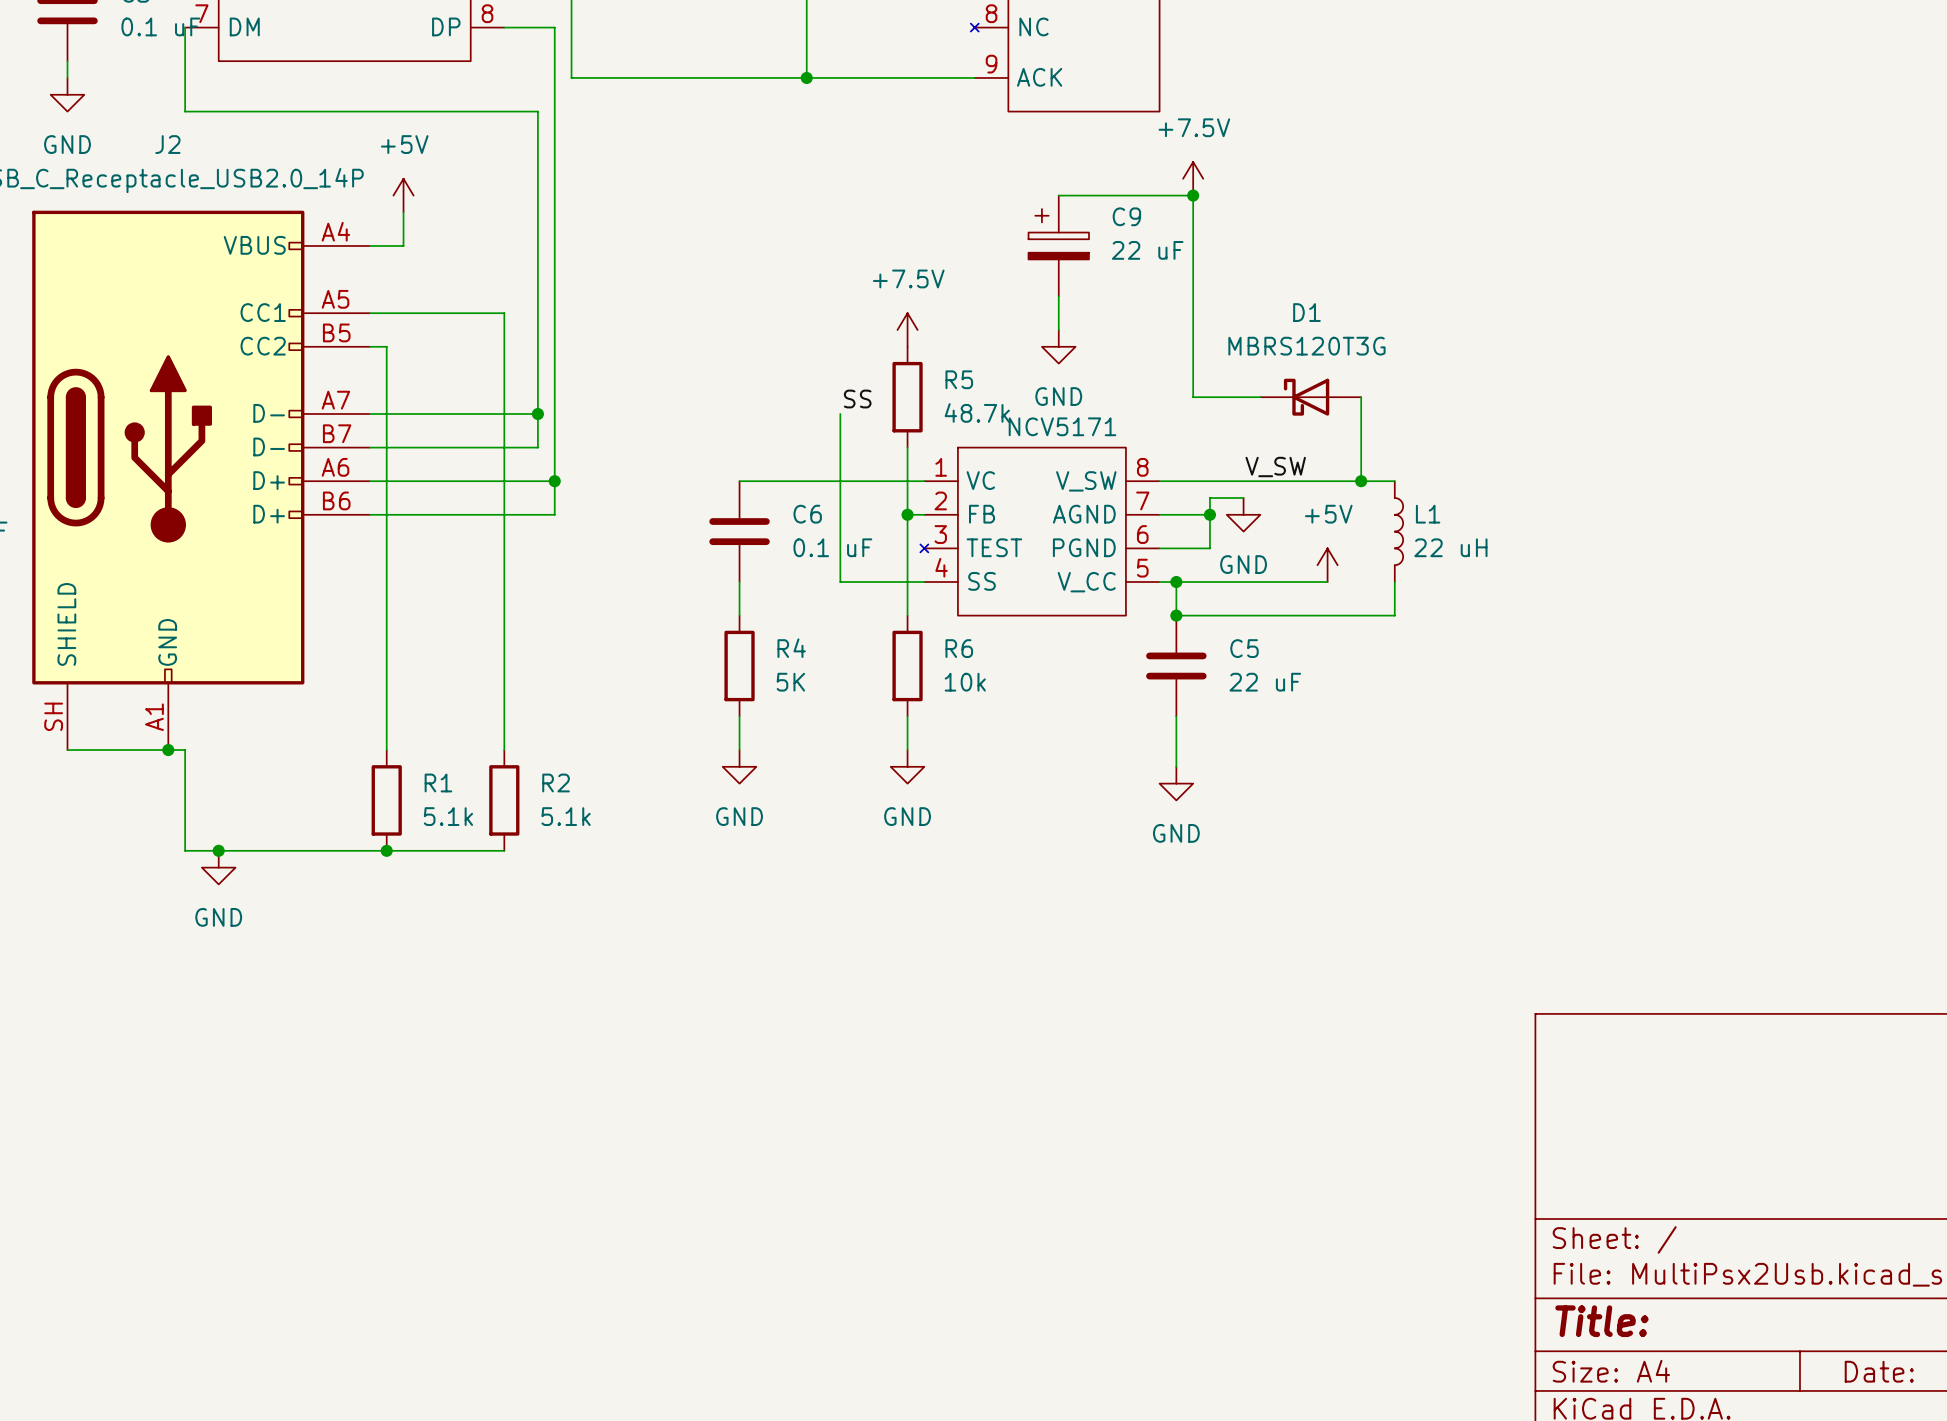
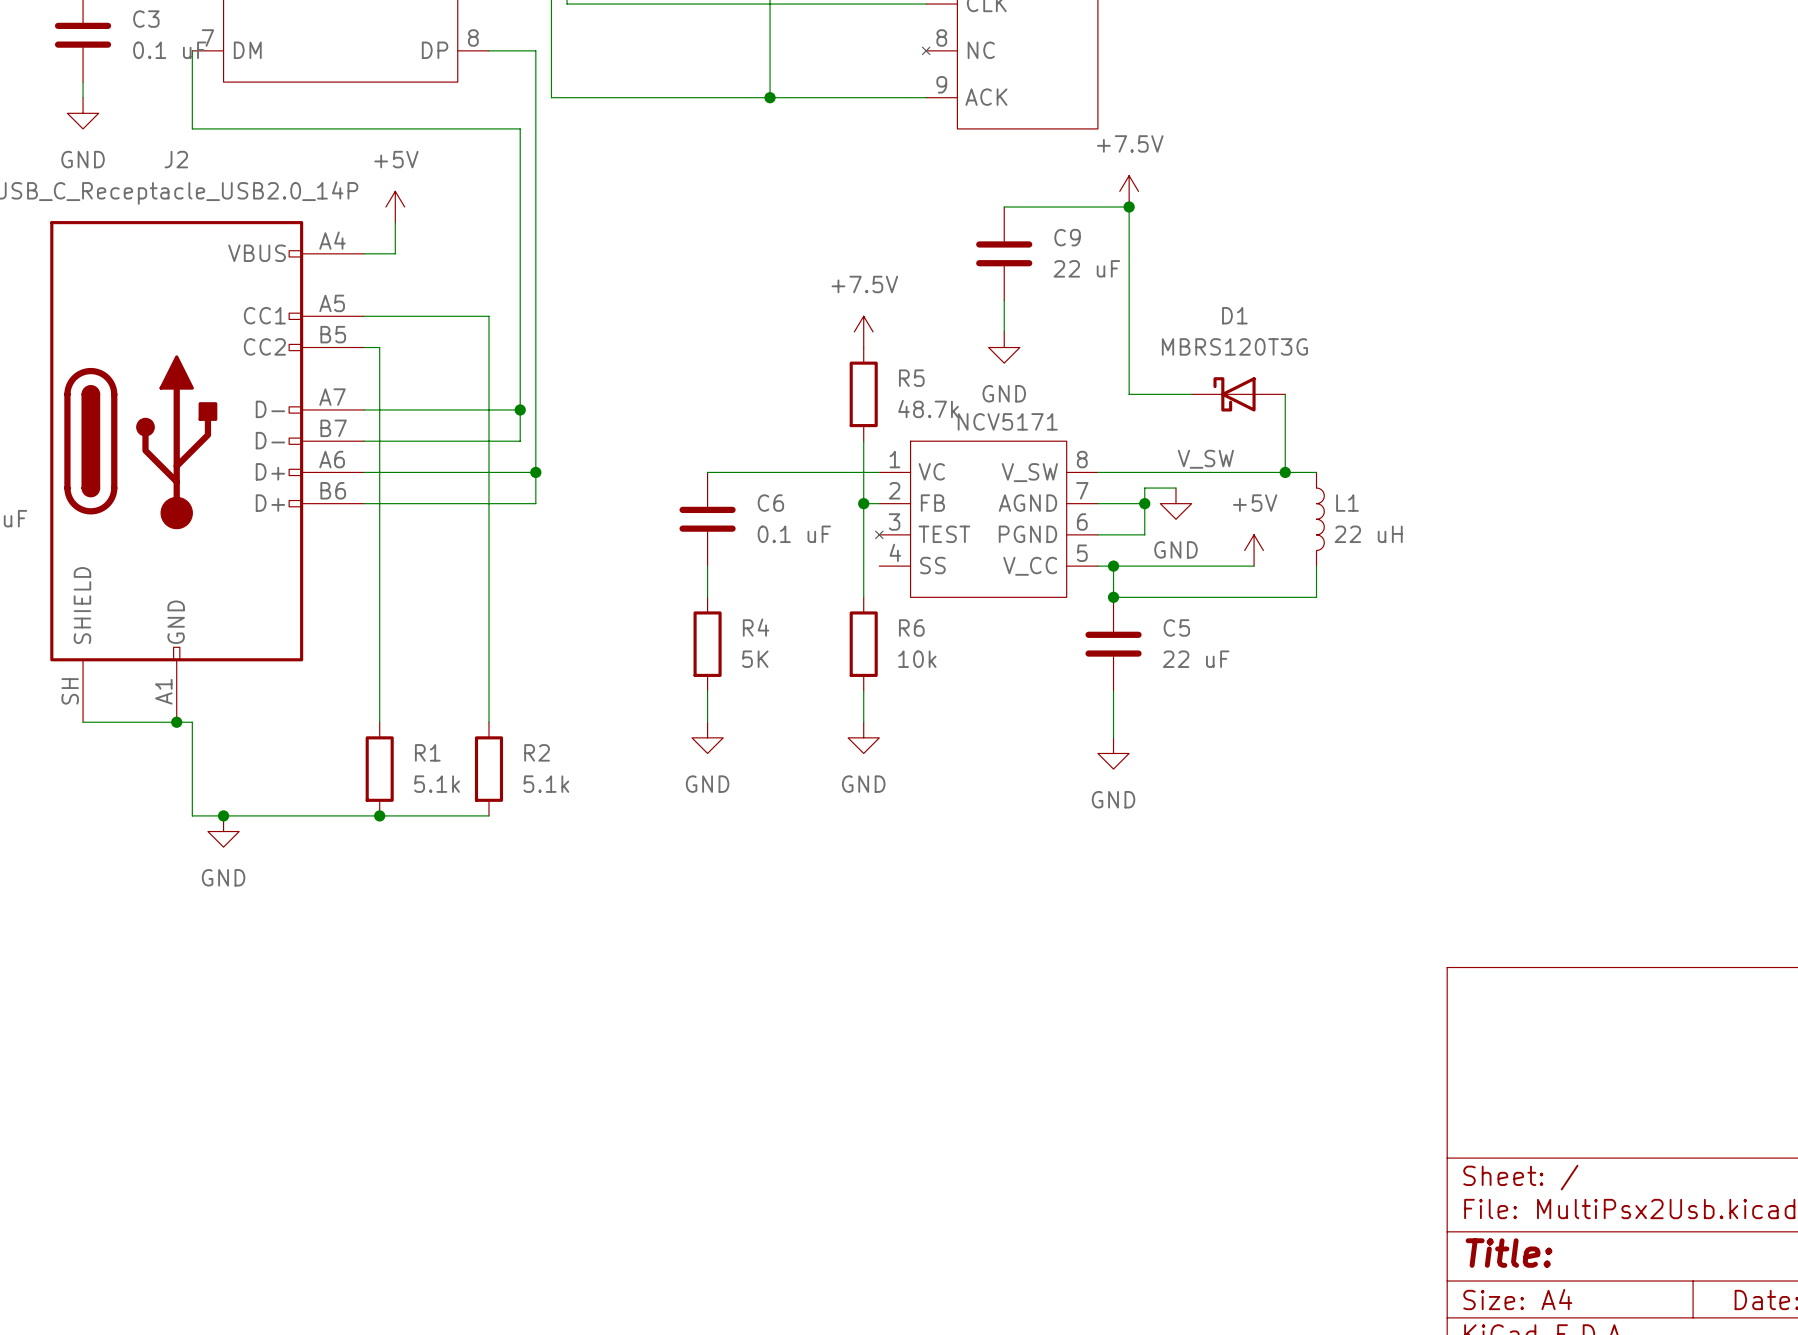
C9 symbol: [1028, 195, 1090, 297] -> [976, 207, 1033, 301]
label: SS (857, 399) -> none
wire: (840, 413) (840, 582) (924, 582) -> none

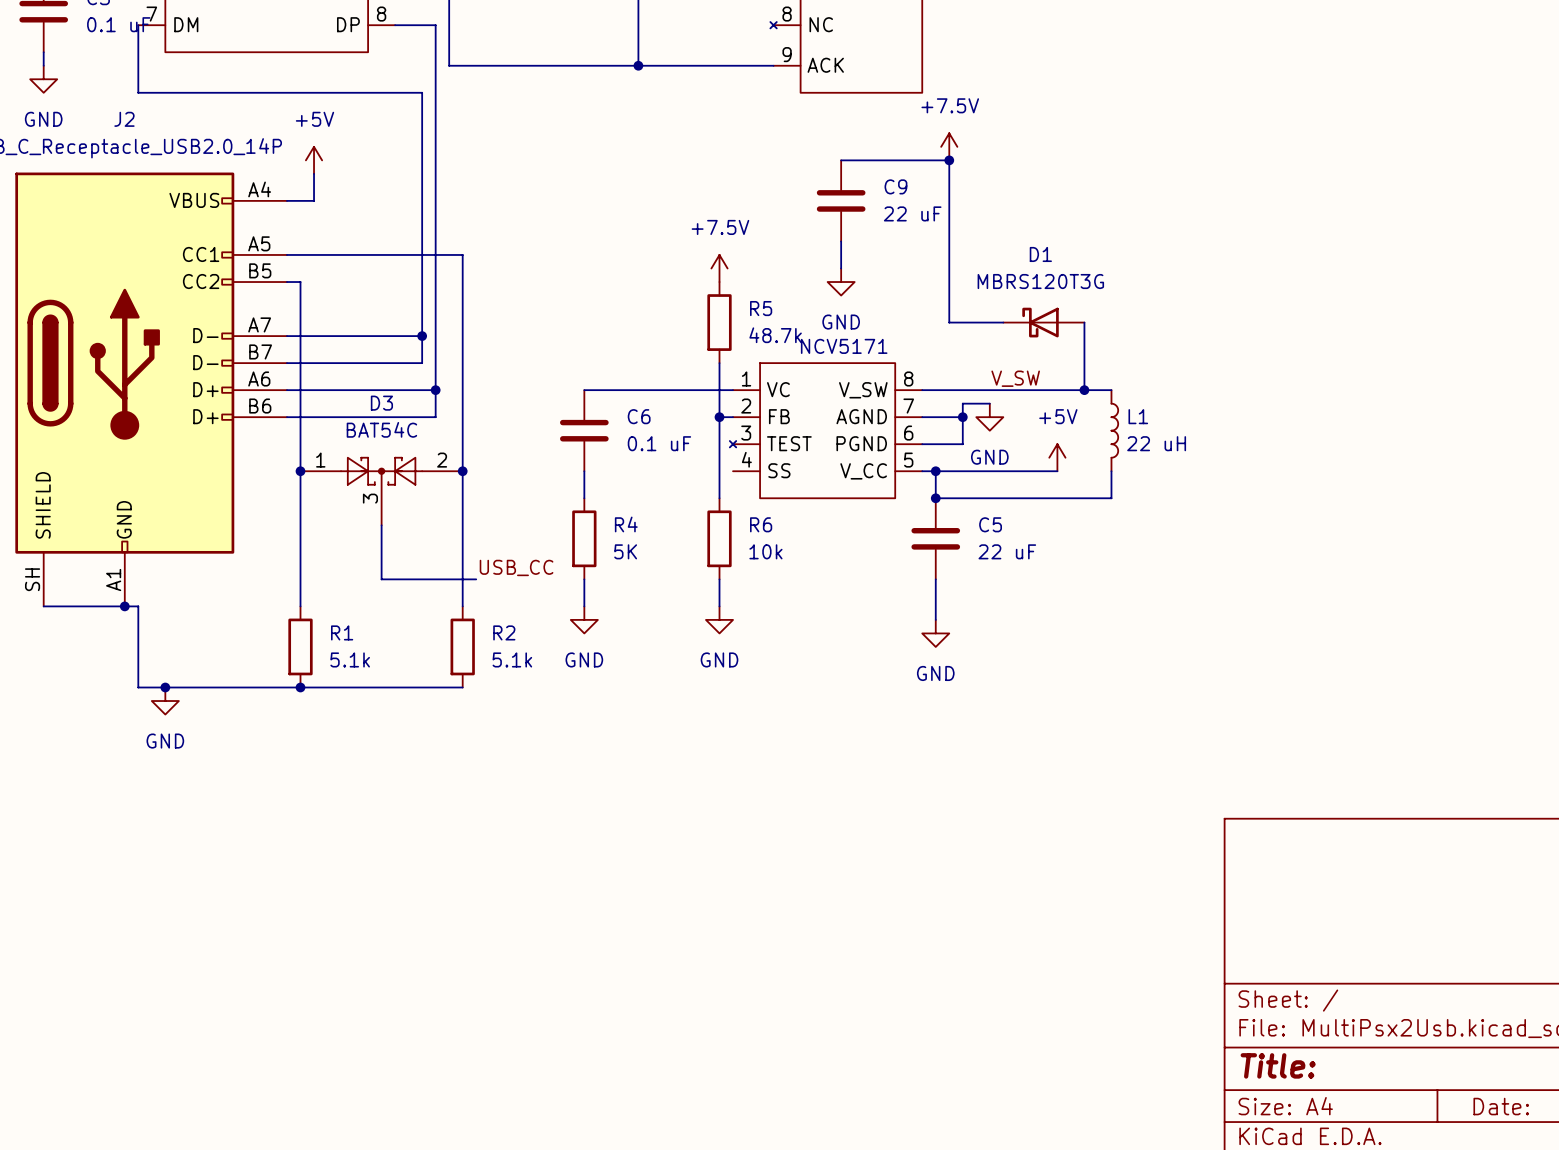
wire: (488, 316) (488, 722) -> (395, 254) (462, 254) (462, 606)
junction: none -> (300, 471)
junction: none -> (462, 471)
D3: none -> BAT54C (381, 491)
wire: none -> (381, 525) (381, 579) (476, 579)
label: none -> USB_CC (516, 567)
R2 position: (488, 769) -> (462, 646)
wire: none -> (395, 687) (462, 687)

